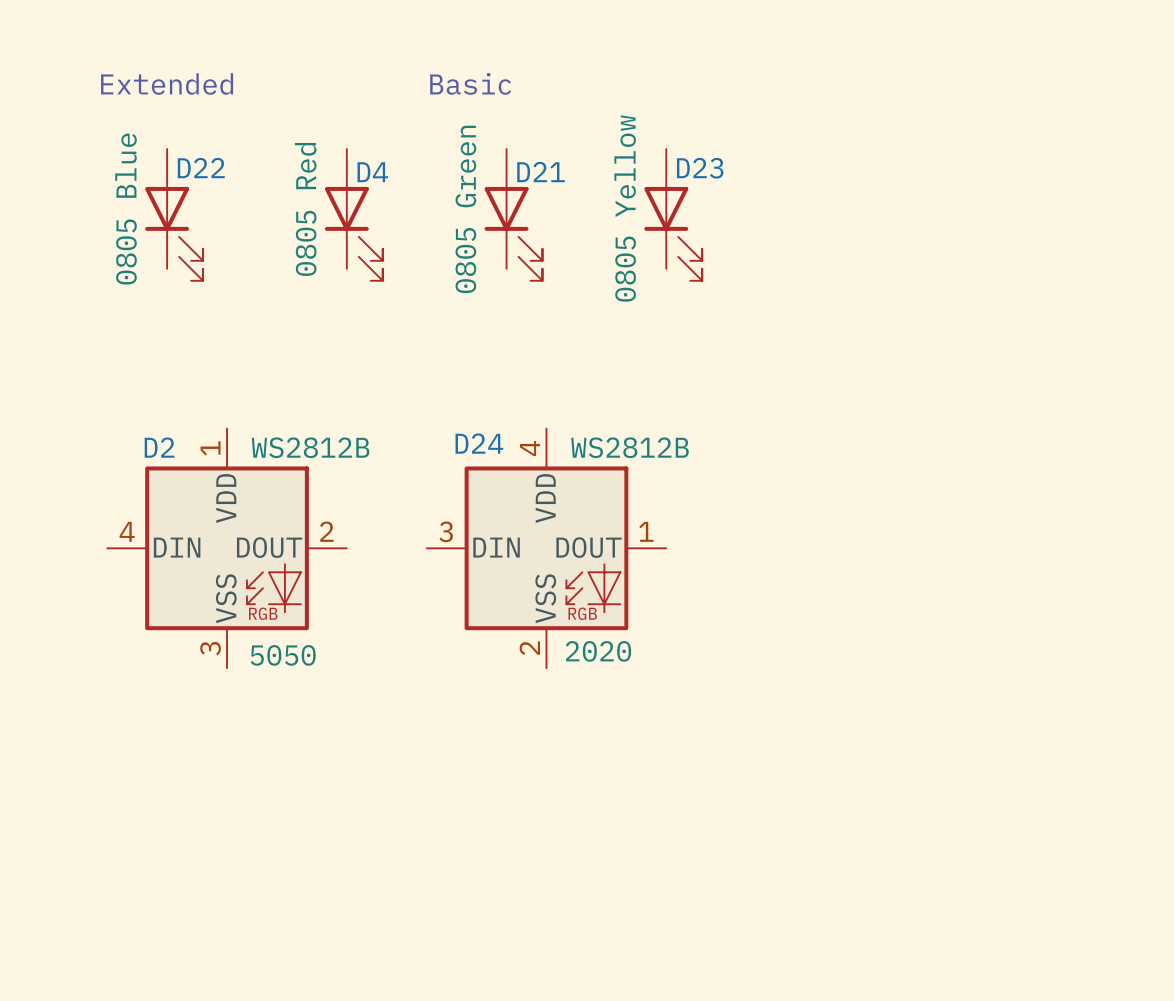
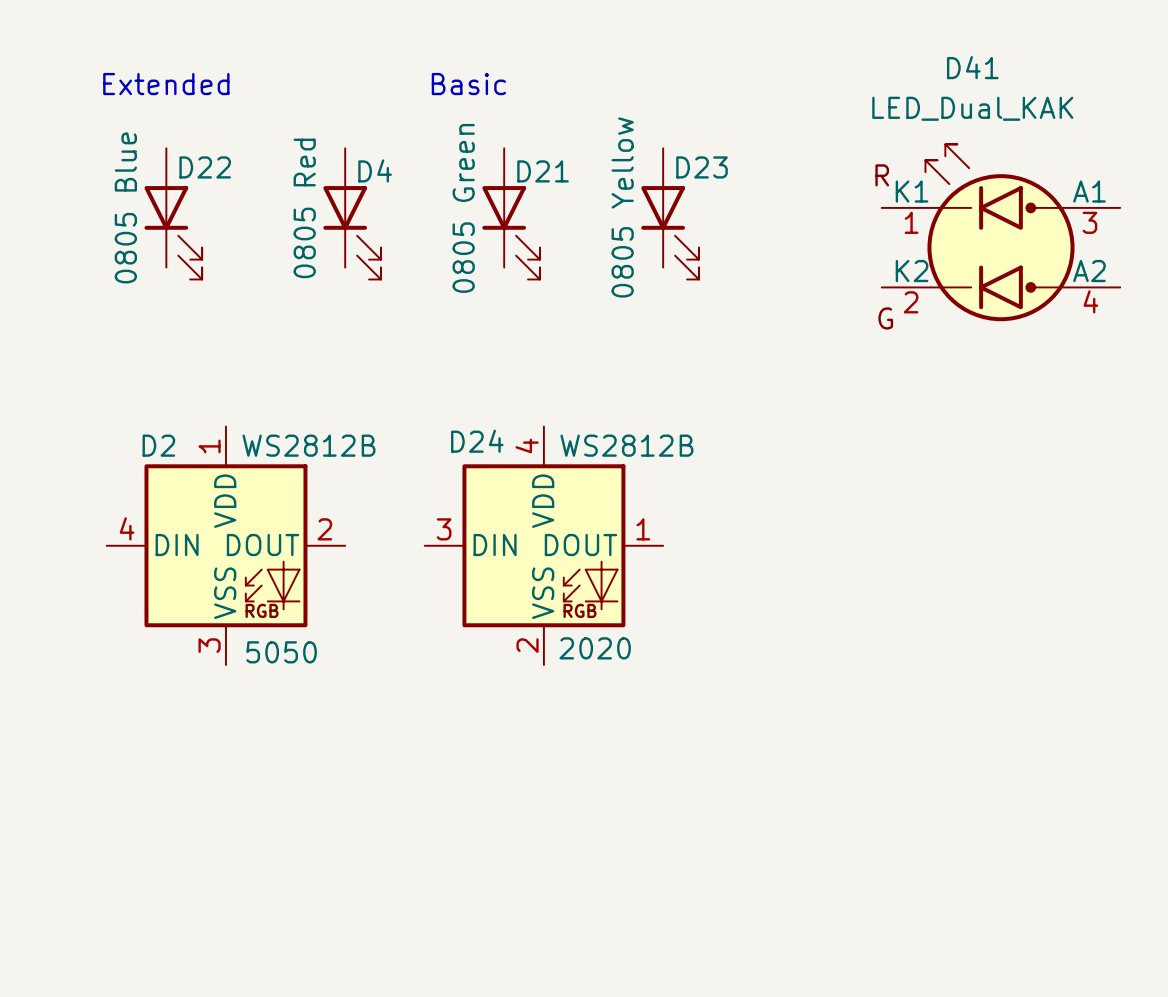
D41: none -> LED_Dual_KAK (1000, 232)

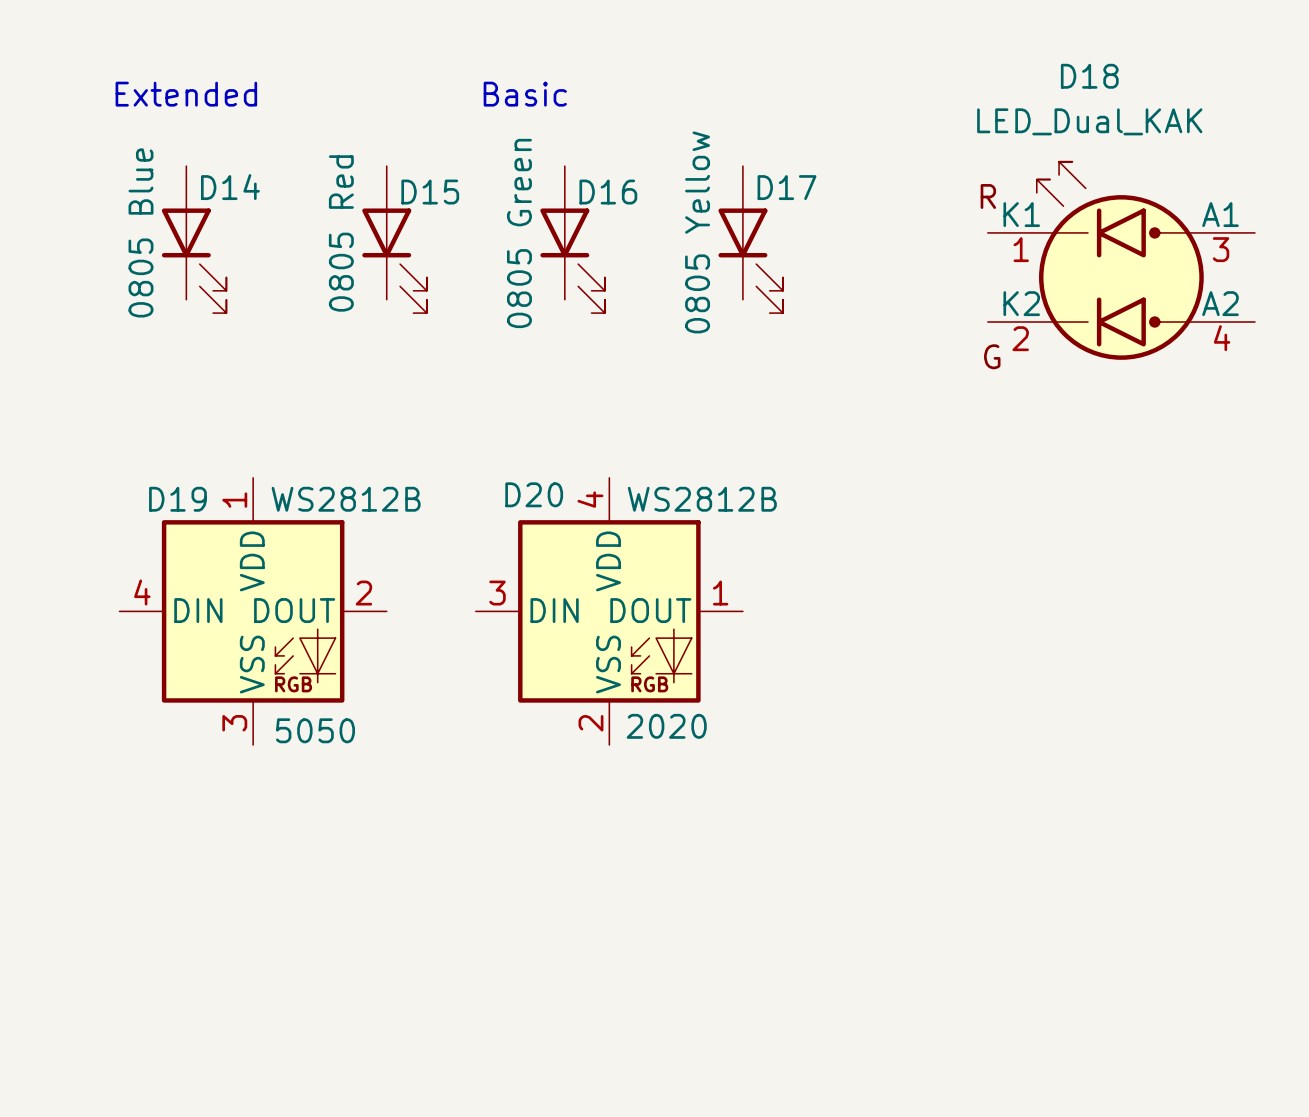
D41 name: D41 (972, 67) -> D18 (1089, 76)
D22 name: D22 (205, 167) -> D14 (230, 187)
D23 name: D23 (702, 167) -> D17 (786, 187)
D4 name: D4 (375, 170) -> D15 (430, 192)
D21 name: D21 (543, 171) -> D16 (608, 192)
D24 name: D24 (477, 441) -> D20 (534, 494)
D2 name: D2 (158, 445) -> D19 (177, 499)

